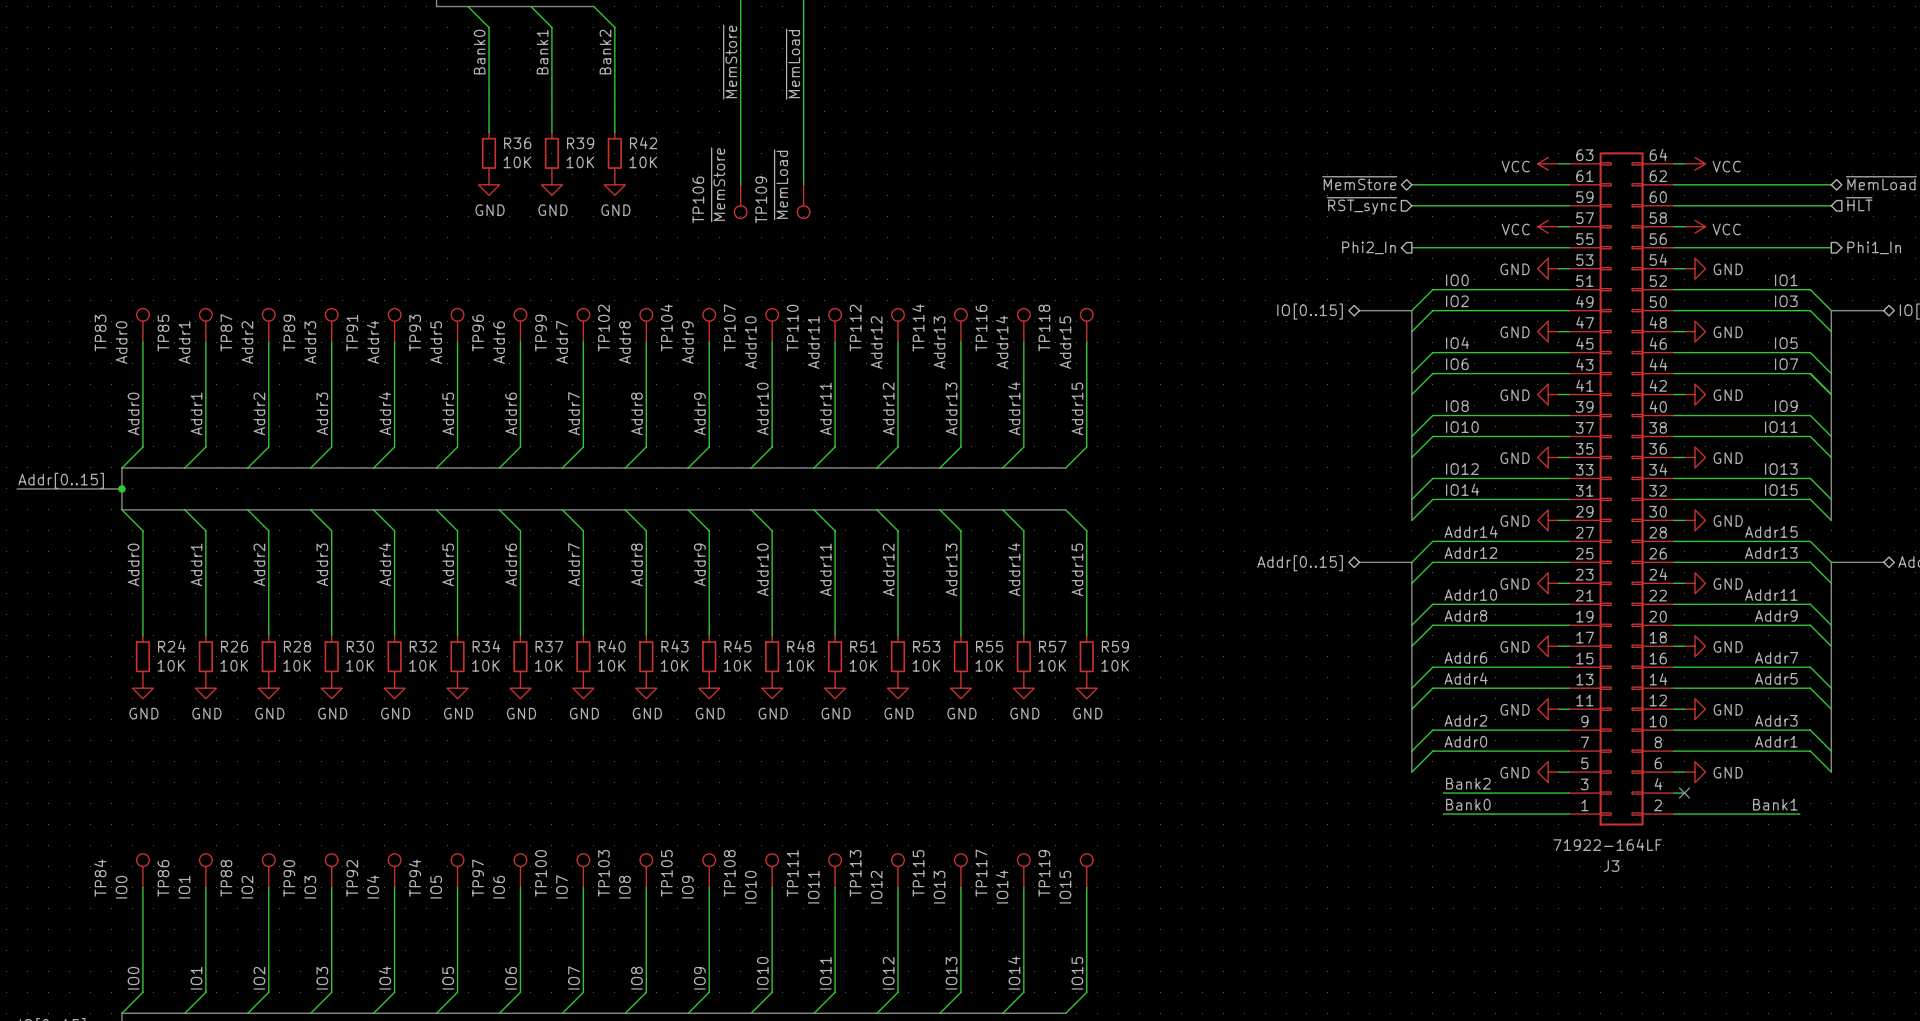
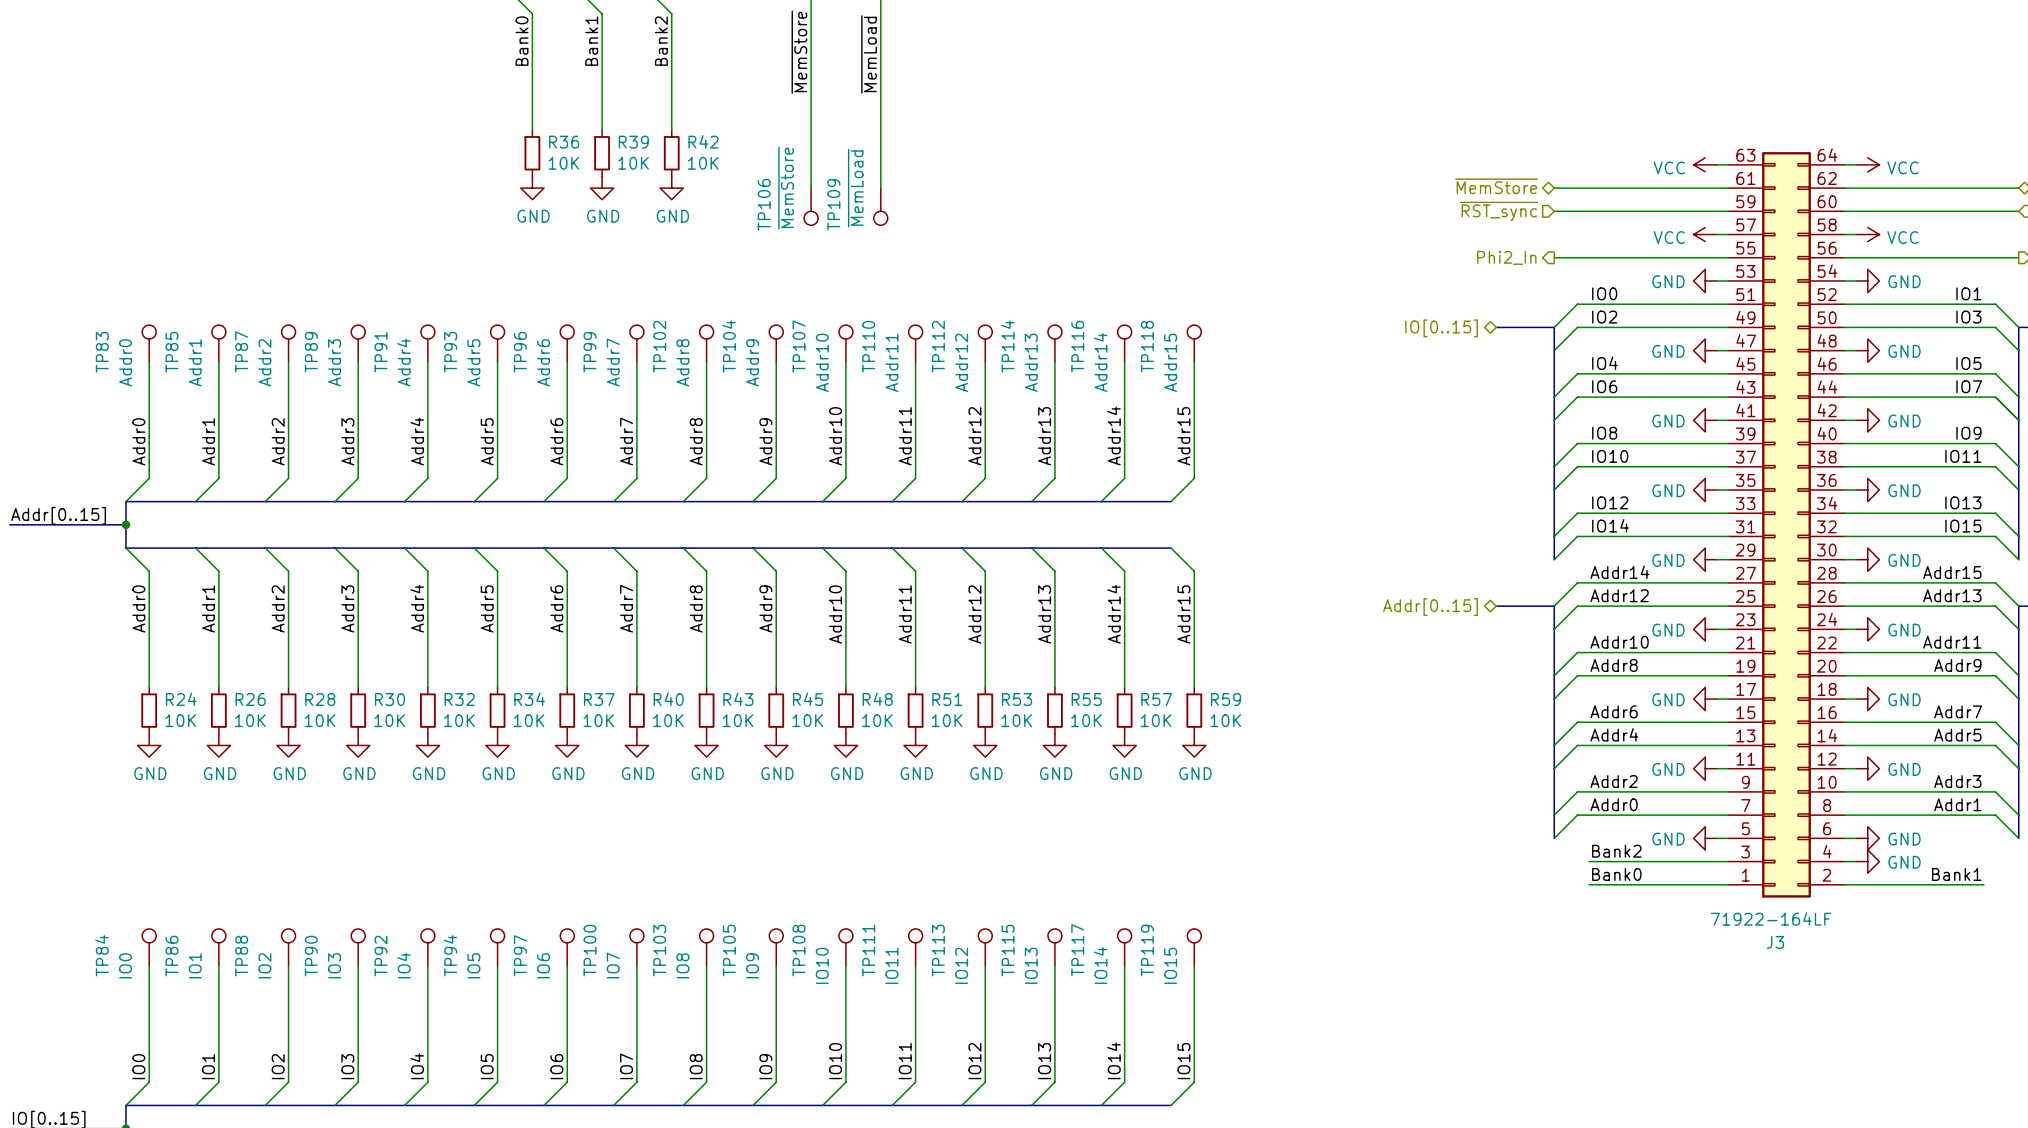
no-connect mark: (1684, 793) -> none
power symbol: none -> GND (1867, 861)

